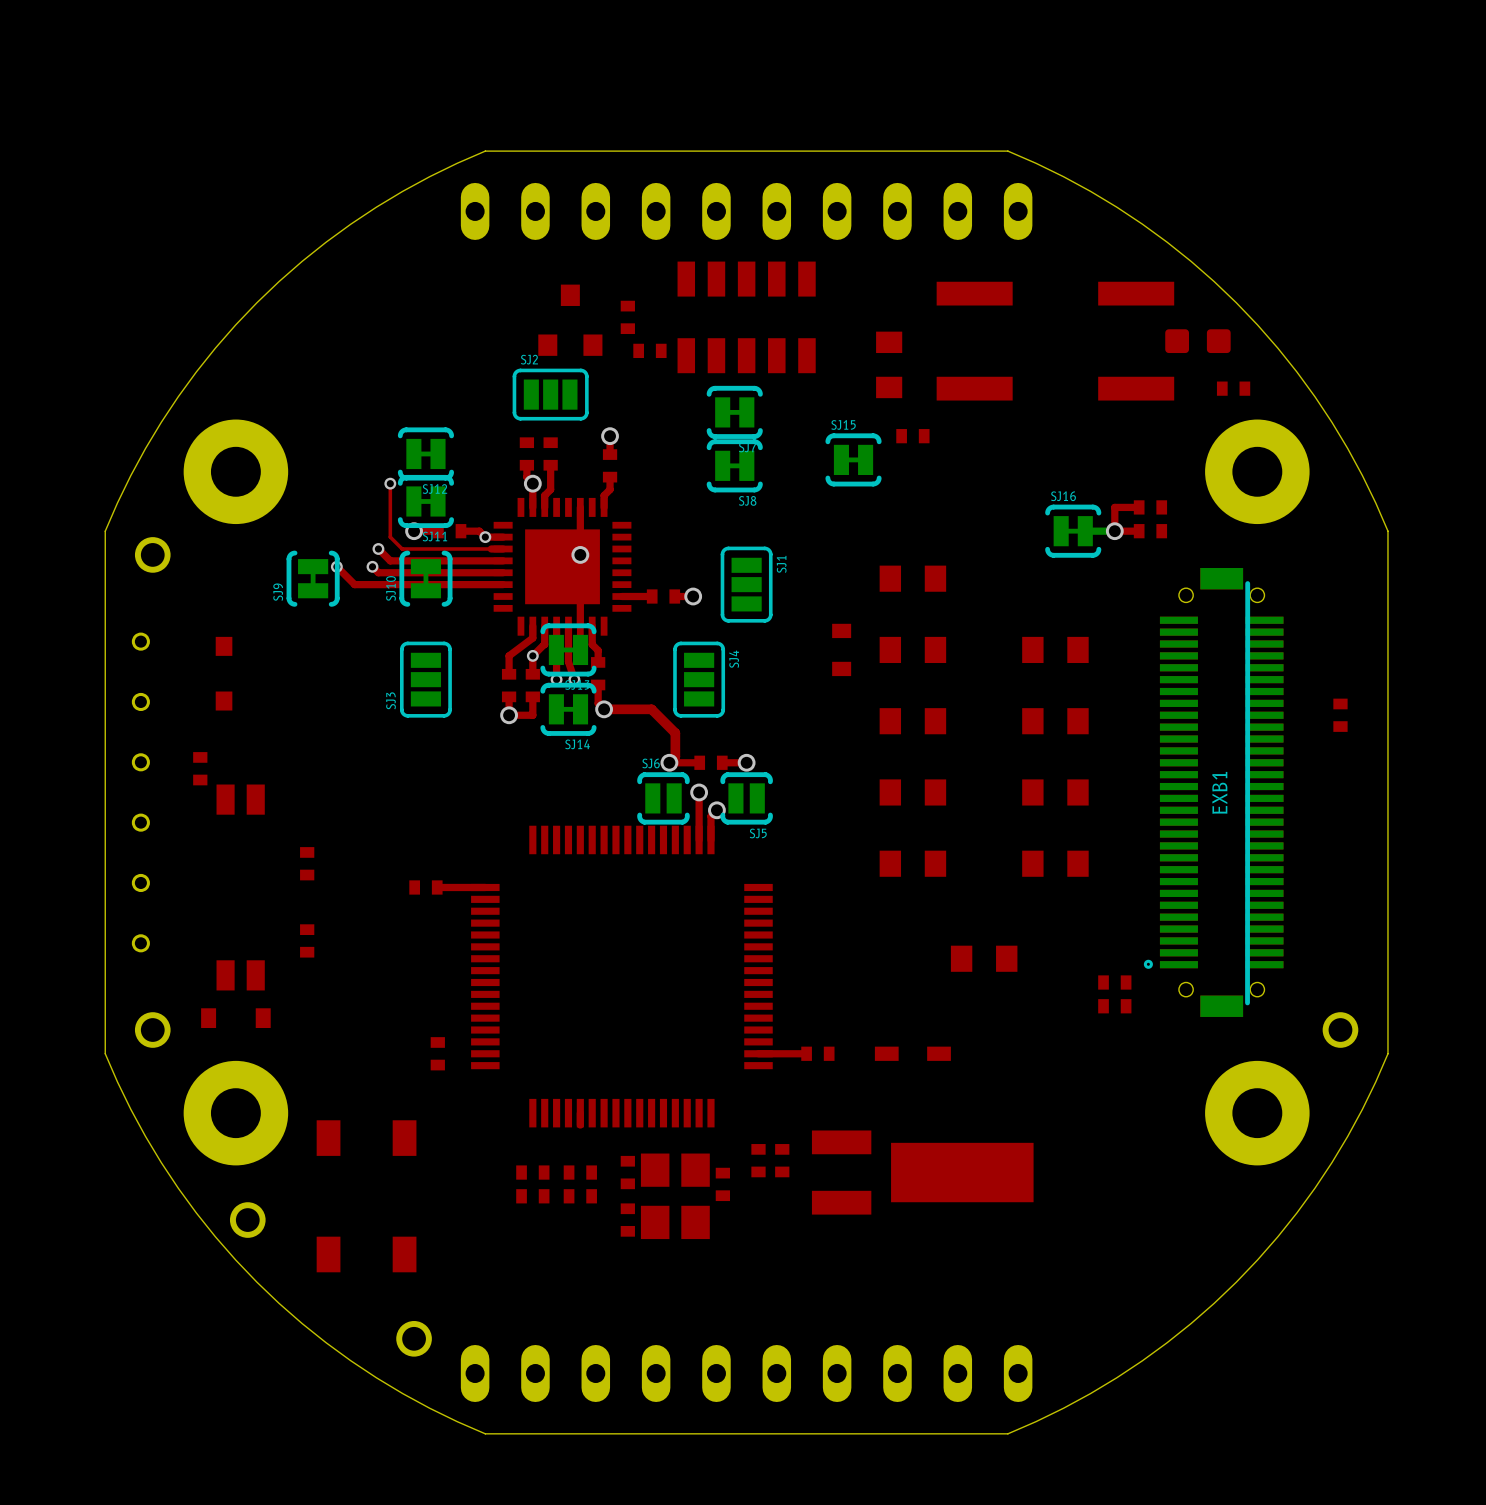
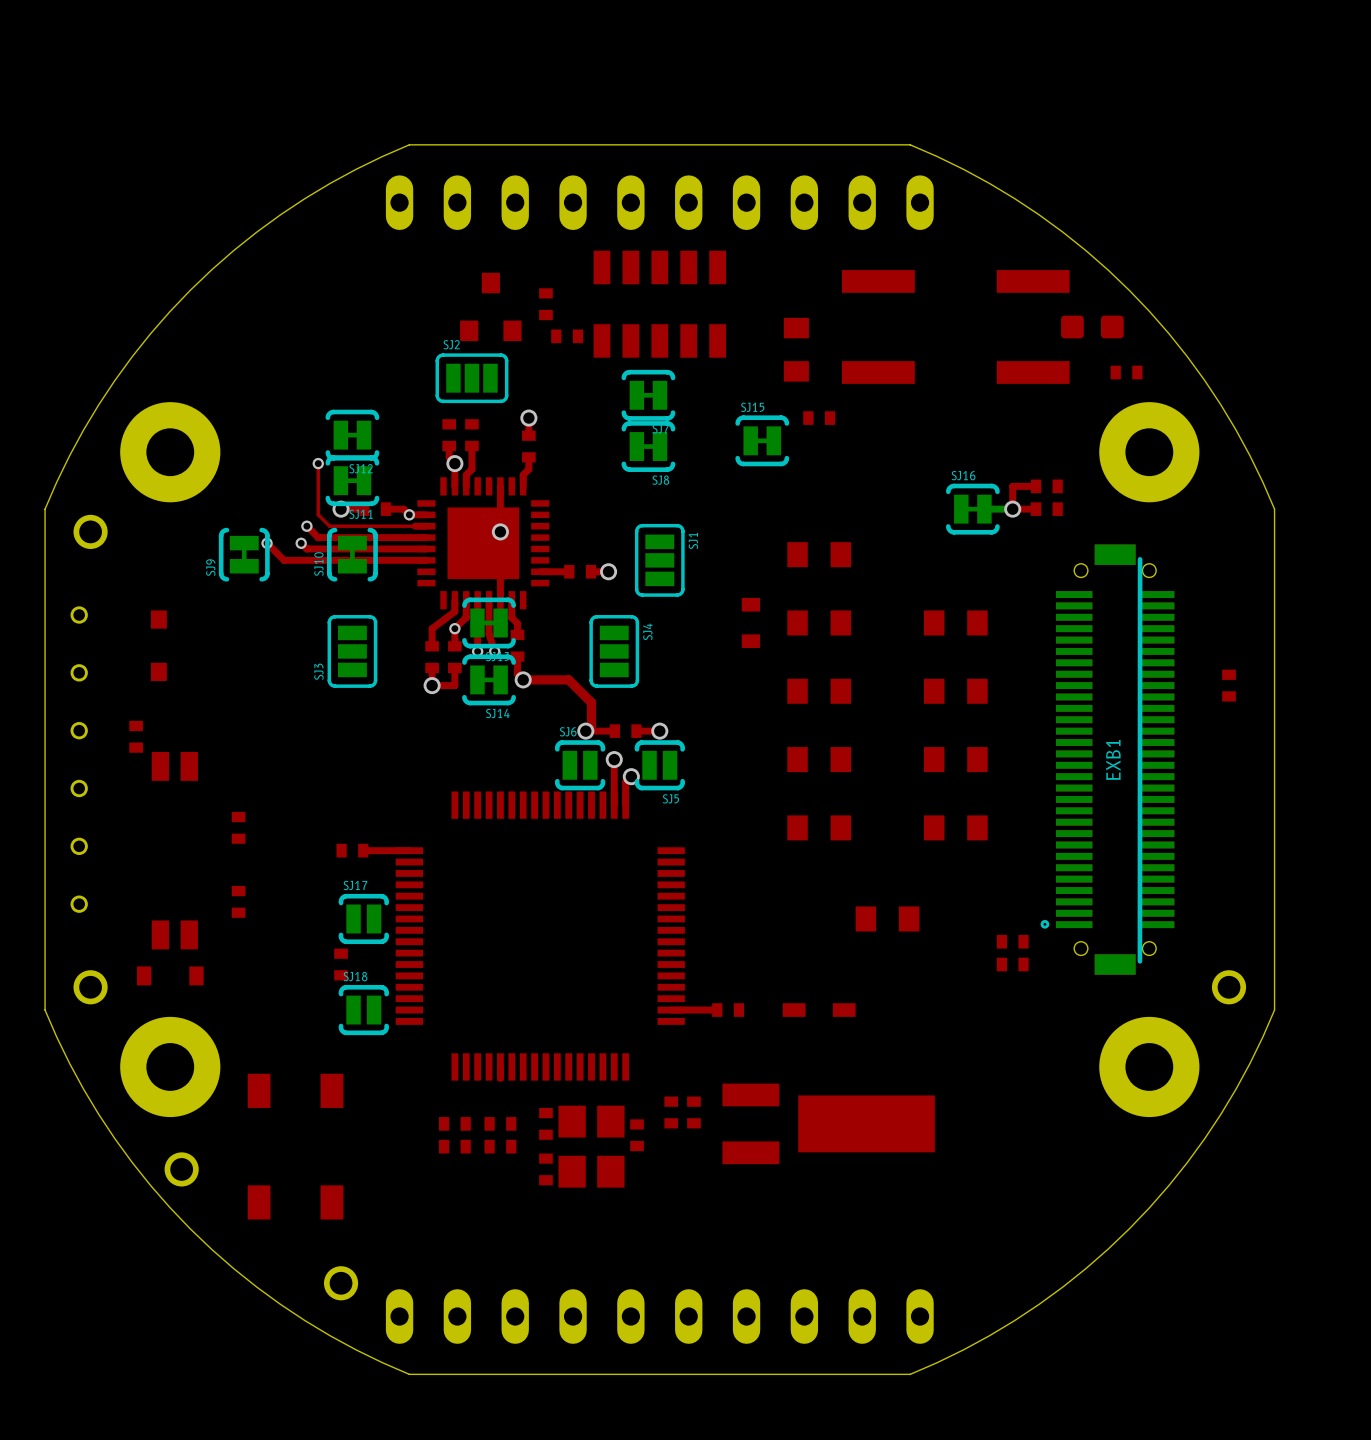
SJ17: none -> (363, 918)
part position: (437, 1053) -> (341, 964)
SJ18: none -> (363, 1010)

